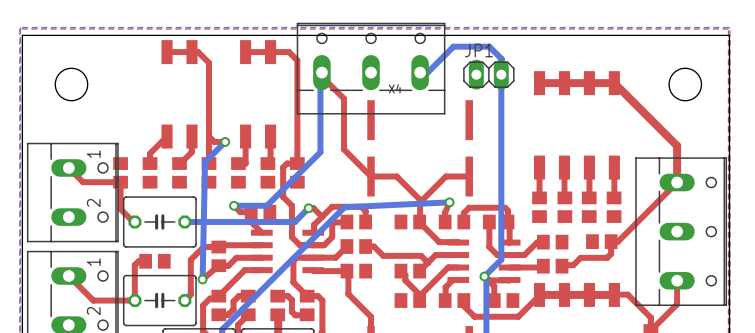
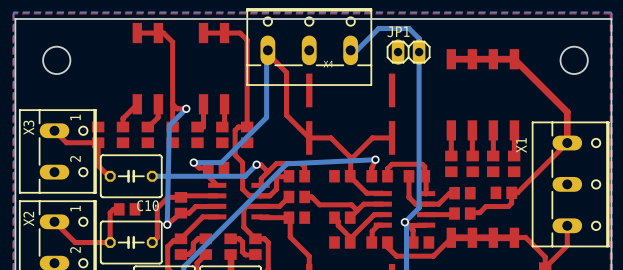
X3 name: none -> X3 (28, 127)
X1 name: none -> X1 (521, 145)
C10 name: none -> C10 (147, 205)
X2 name: none -> X2 (28, 218)

